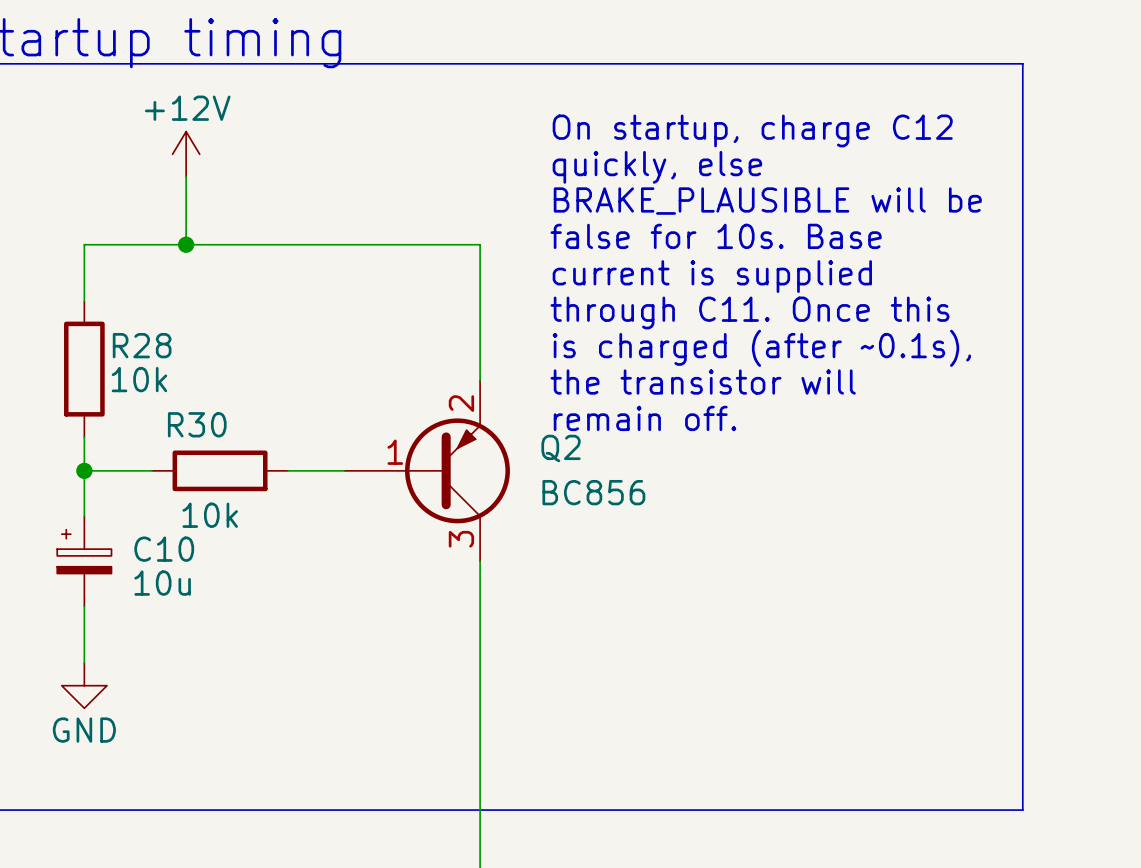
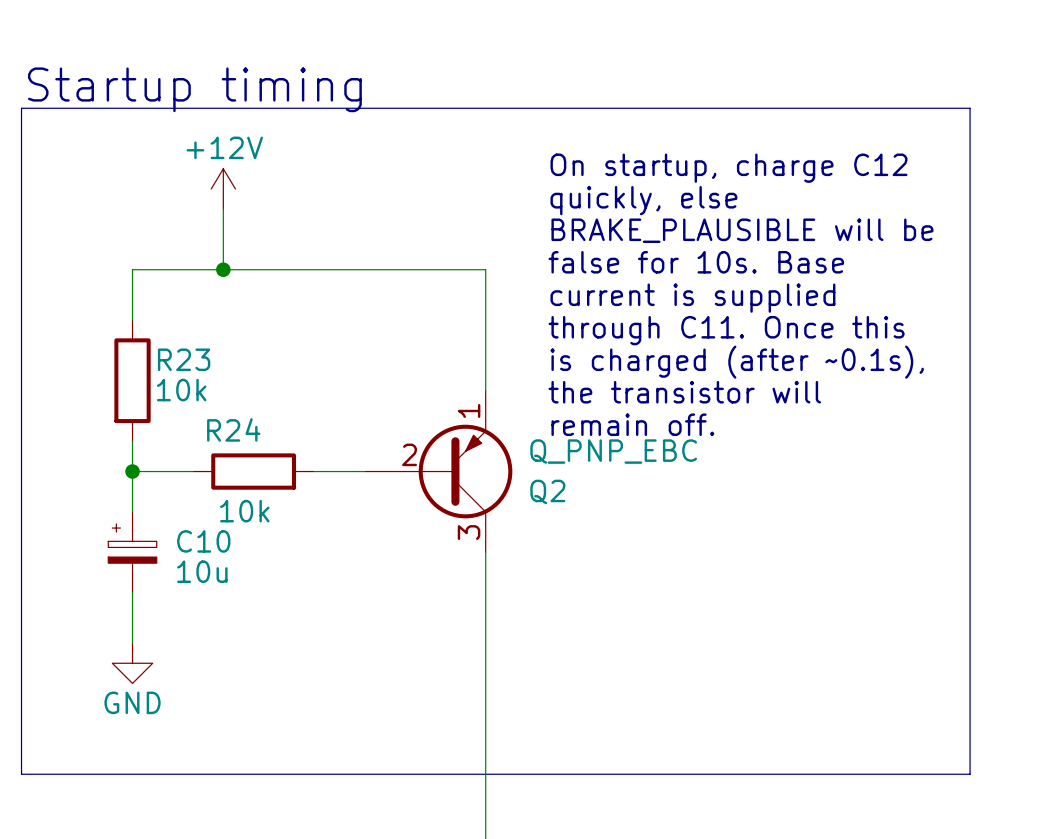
R28 name: R28 (142, 345) -> R23 (184, 359)
Q2 pin number: 2 (461, 403) -> 1 (469, 410)
R30 name: R30 (197, 424) -> R24 (233, 429)
Q2 name position: Q2 (561, 448) -> Q2 (547, 491)
Q2 pin number: 1 (395, 452) -> 2 (409, 454)
Q2 value: BC856 (593, 492) -> Q_PNP_EBC (613, 451)

